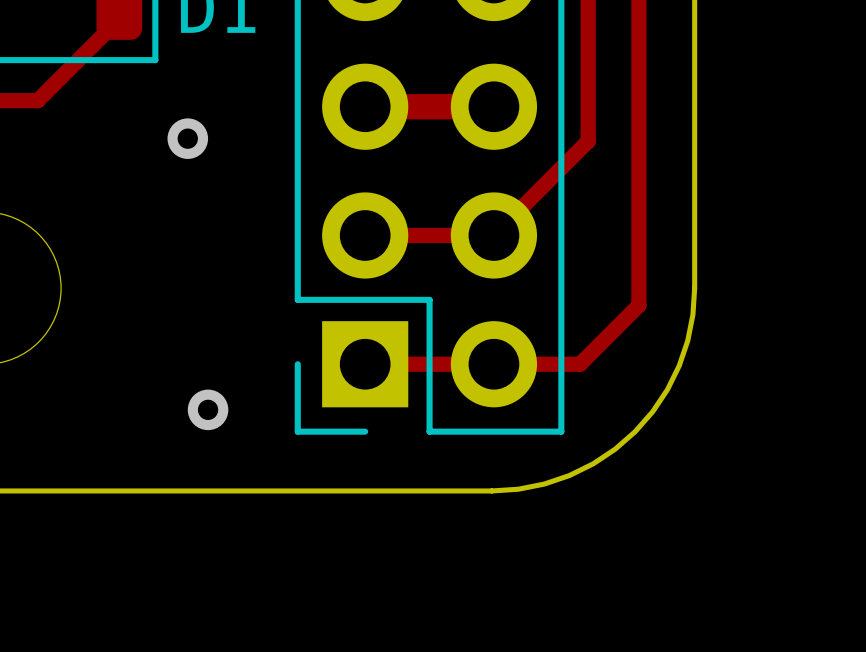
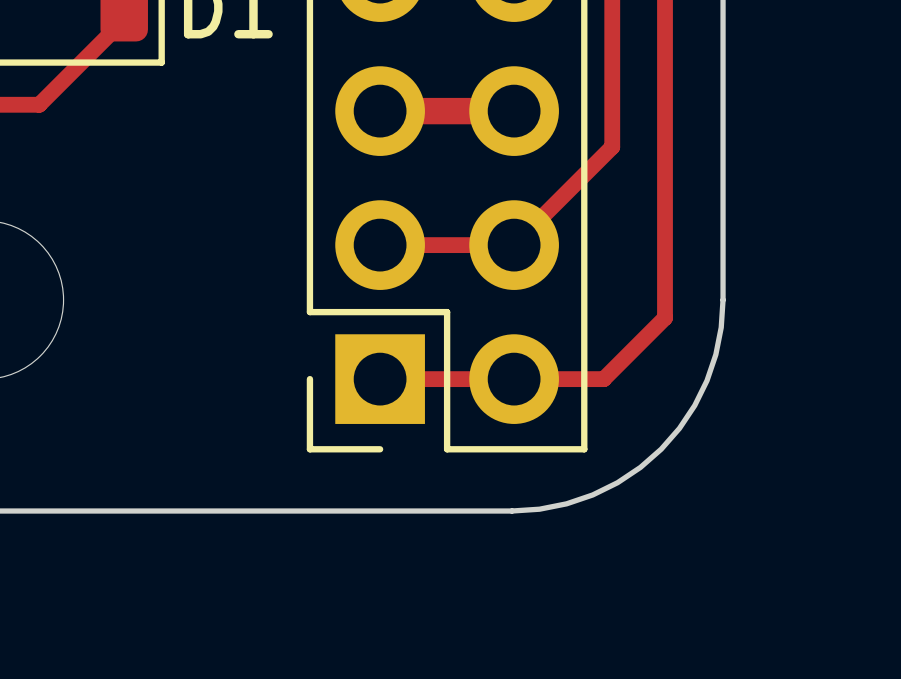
via: (187, 138) -> none
via: (208, 409) -> none

